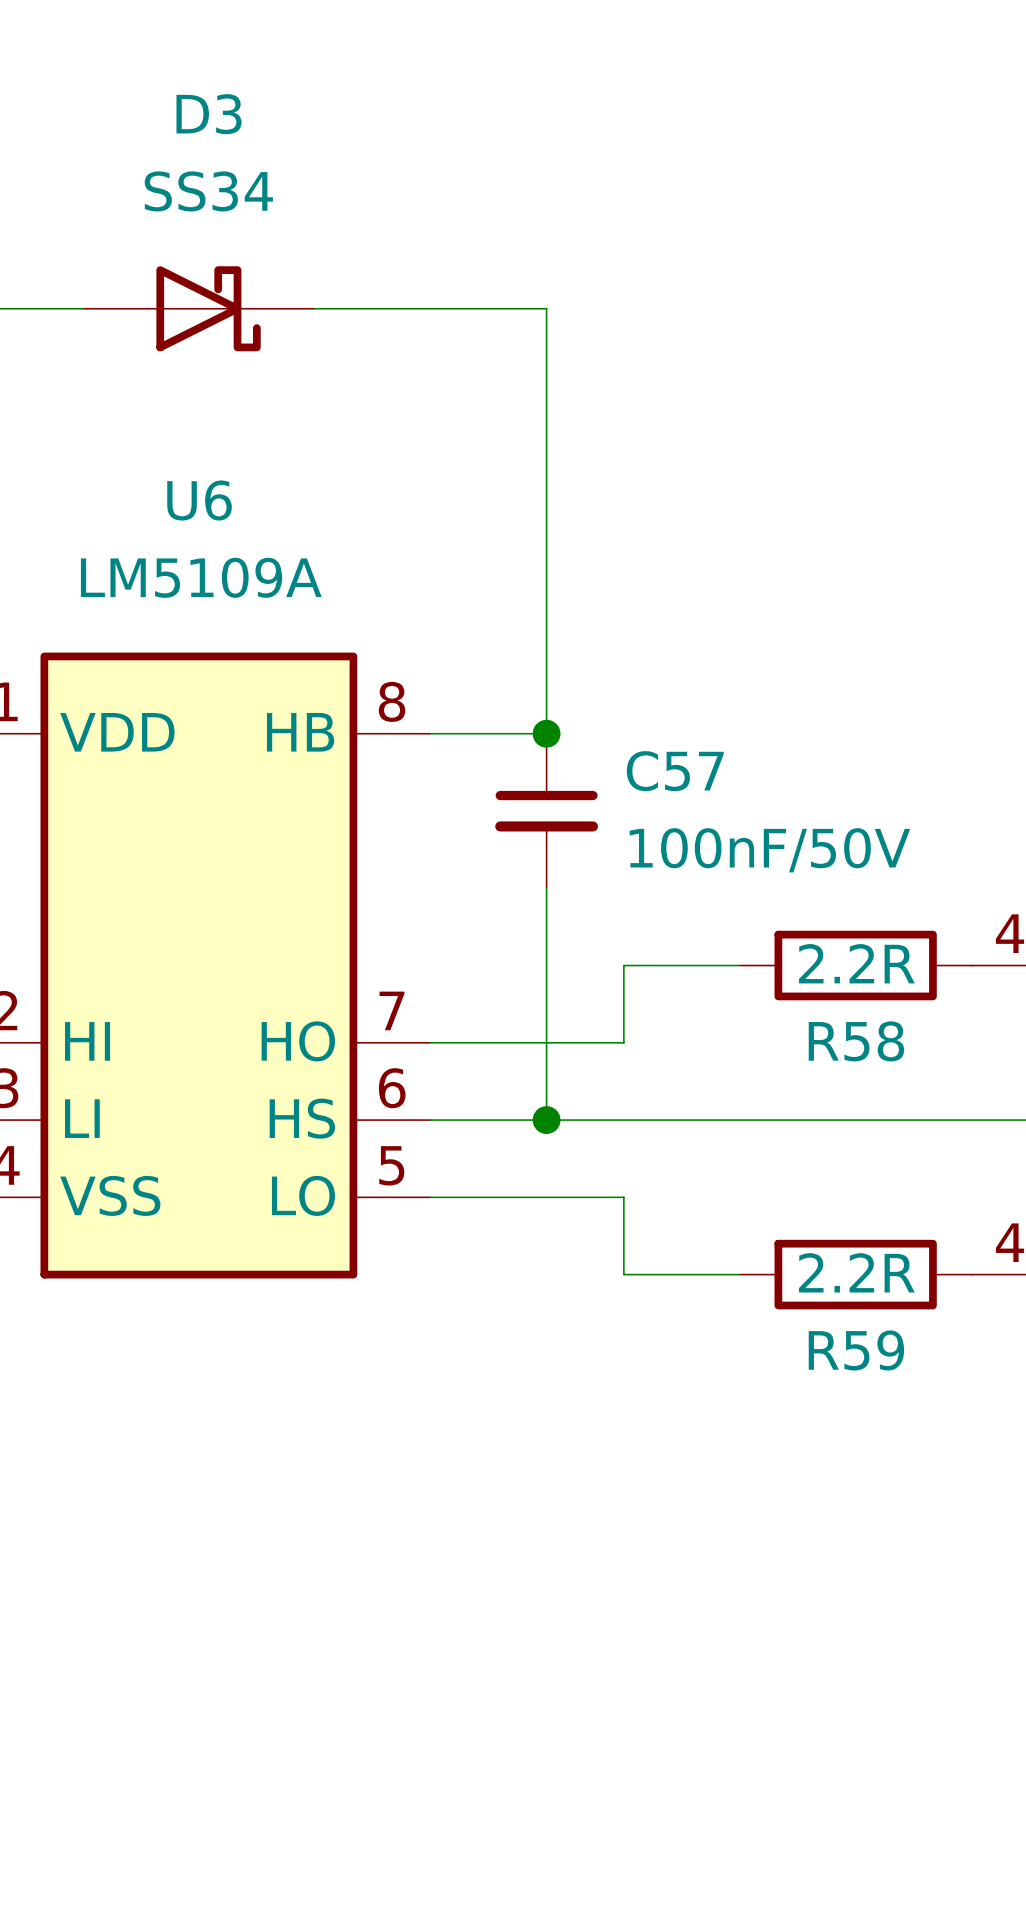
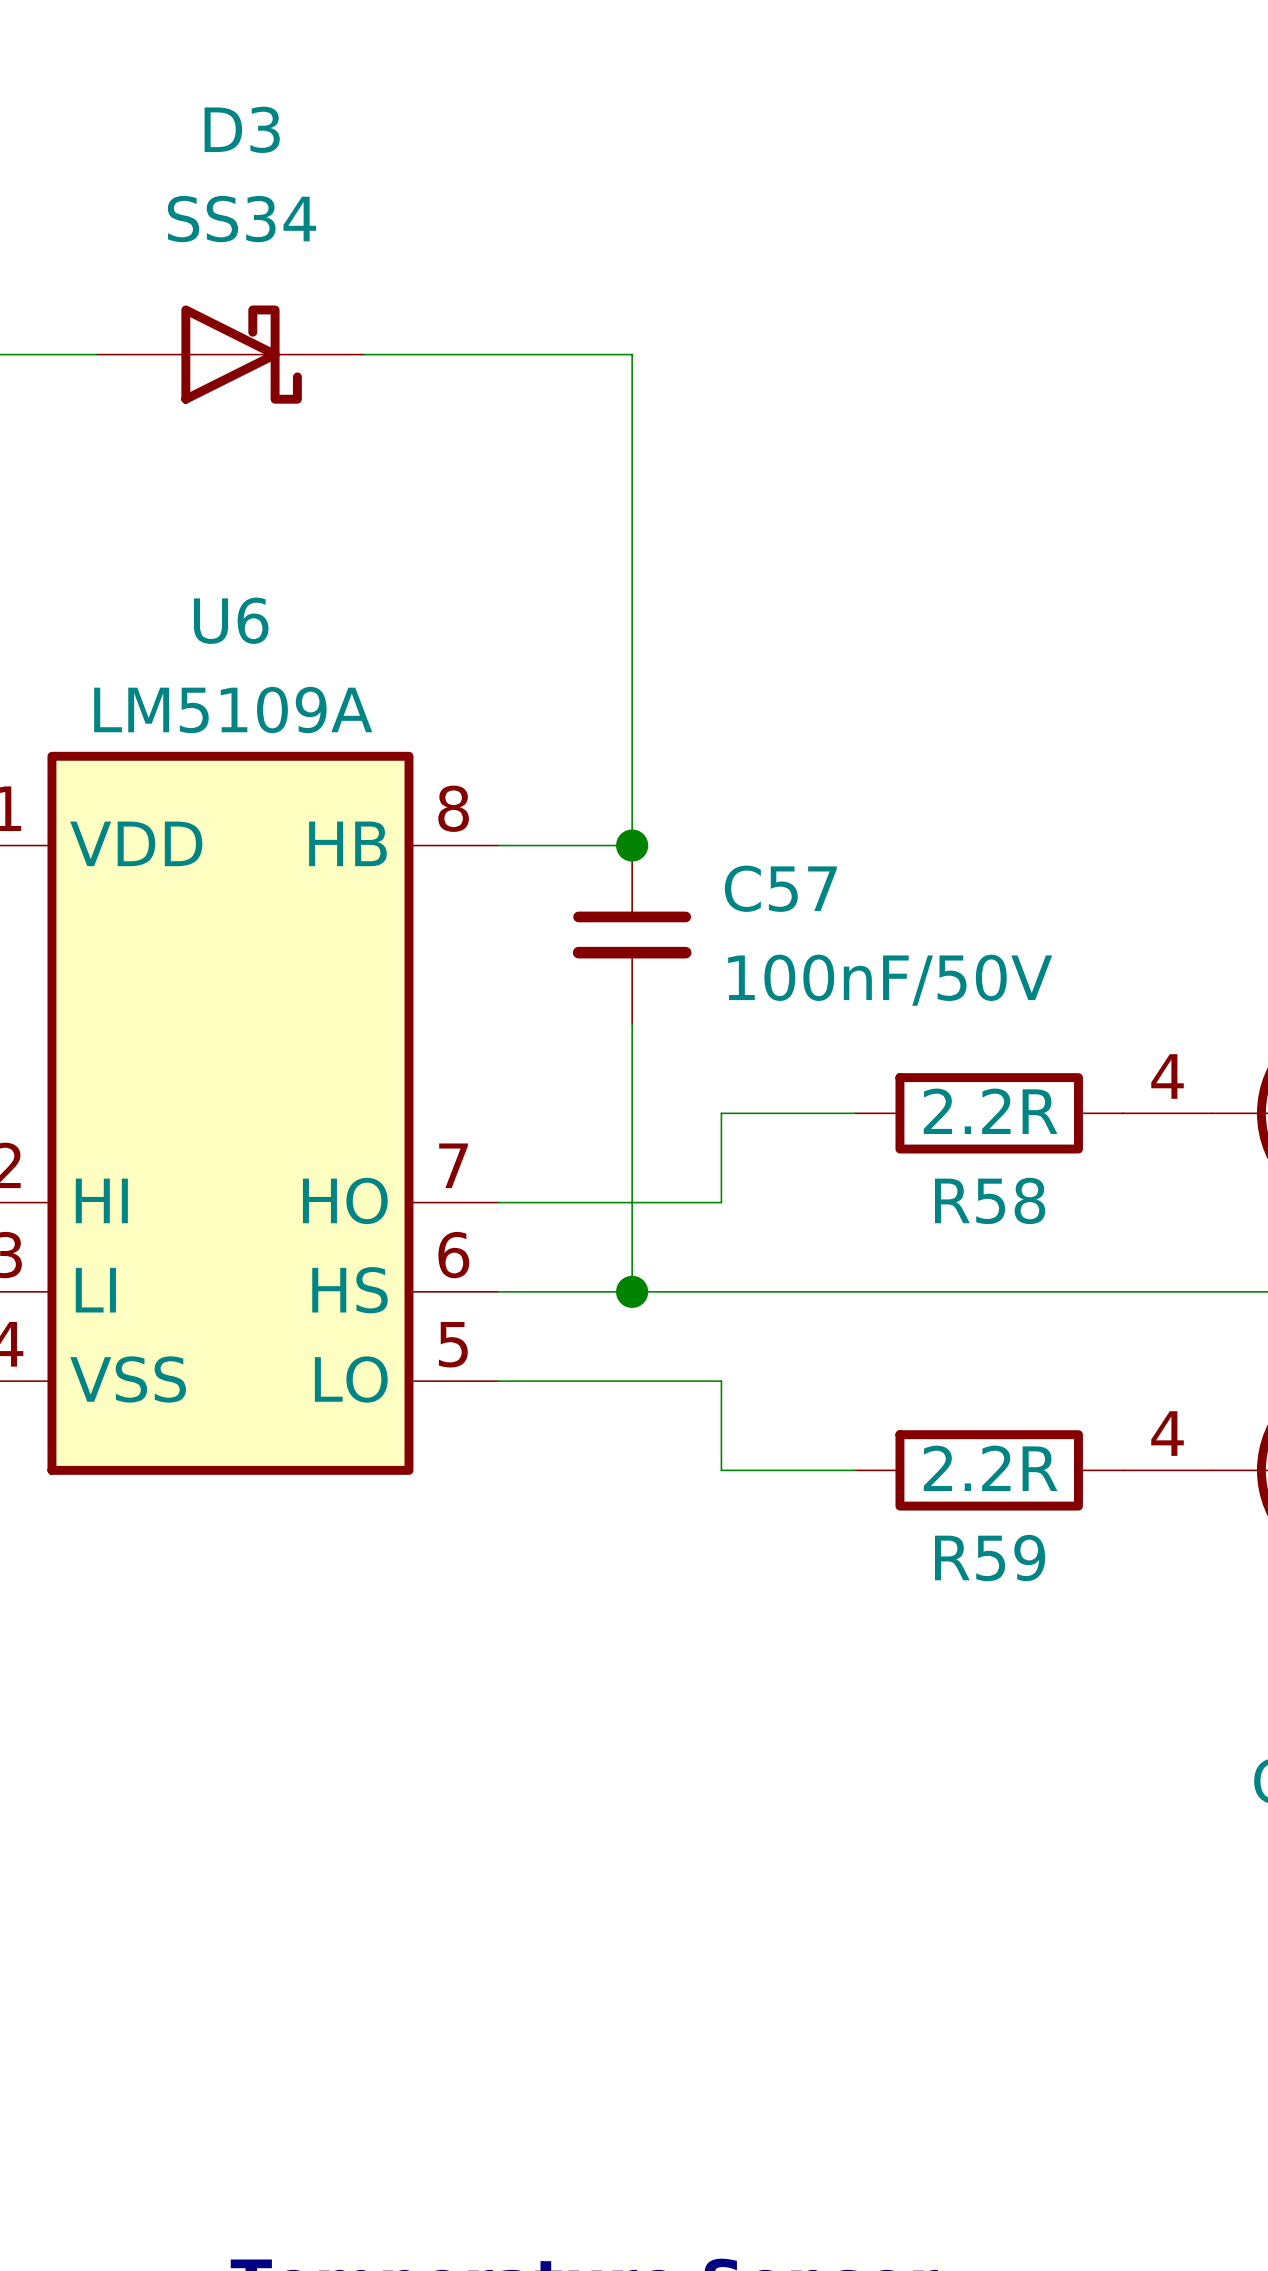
U6 name position: U6 (199, 500) -> U6 (231, 620)
U6 value position: LM5109A (201, 577) -> LM5109A (233, 710)

